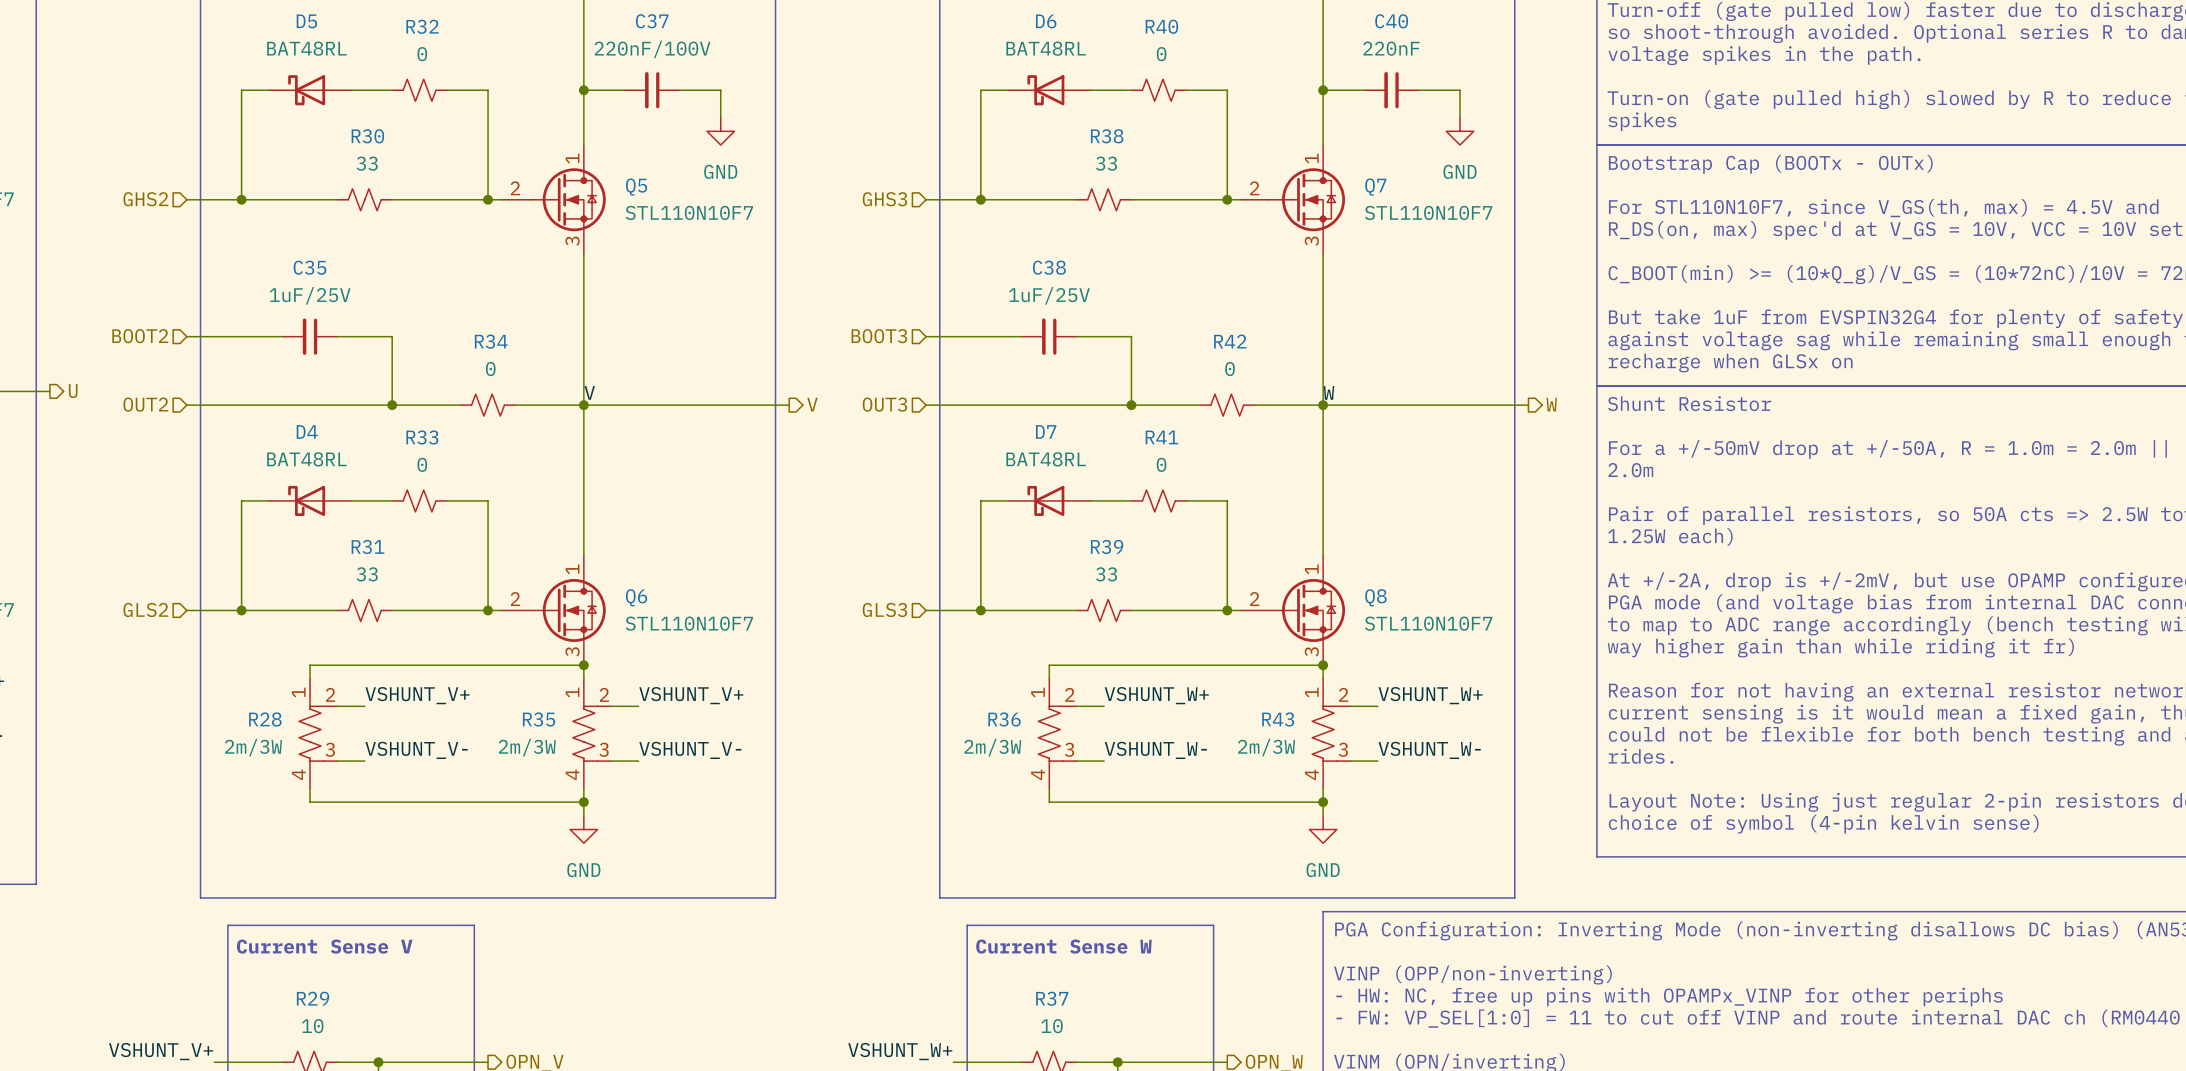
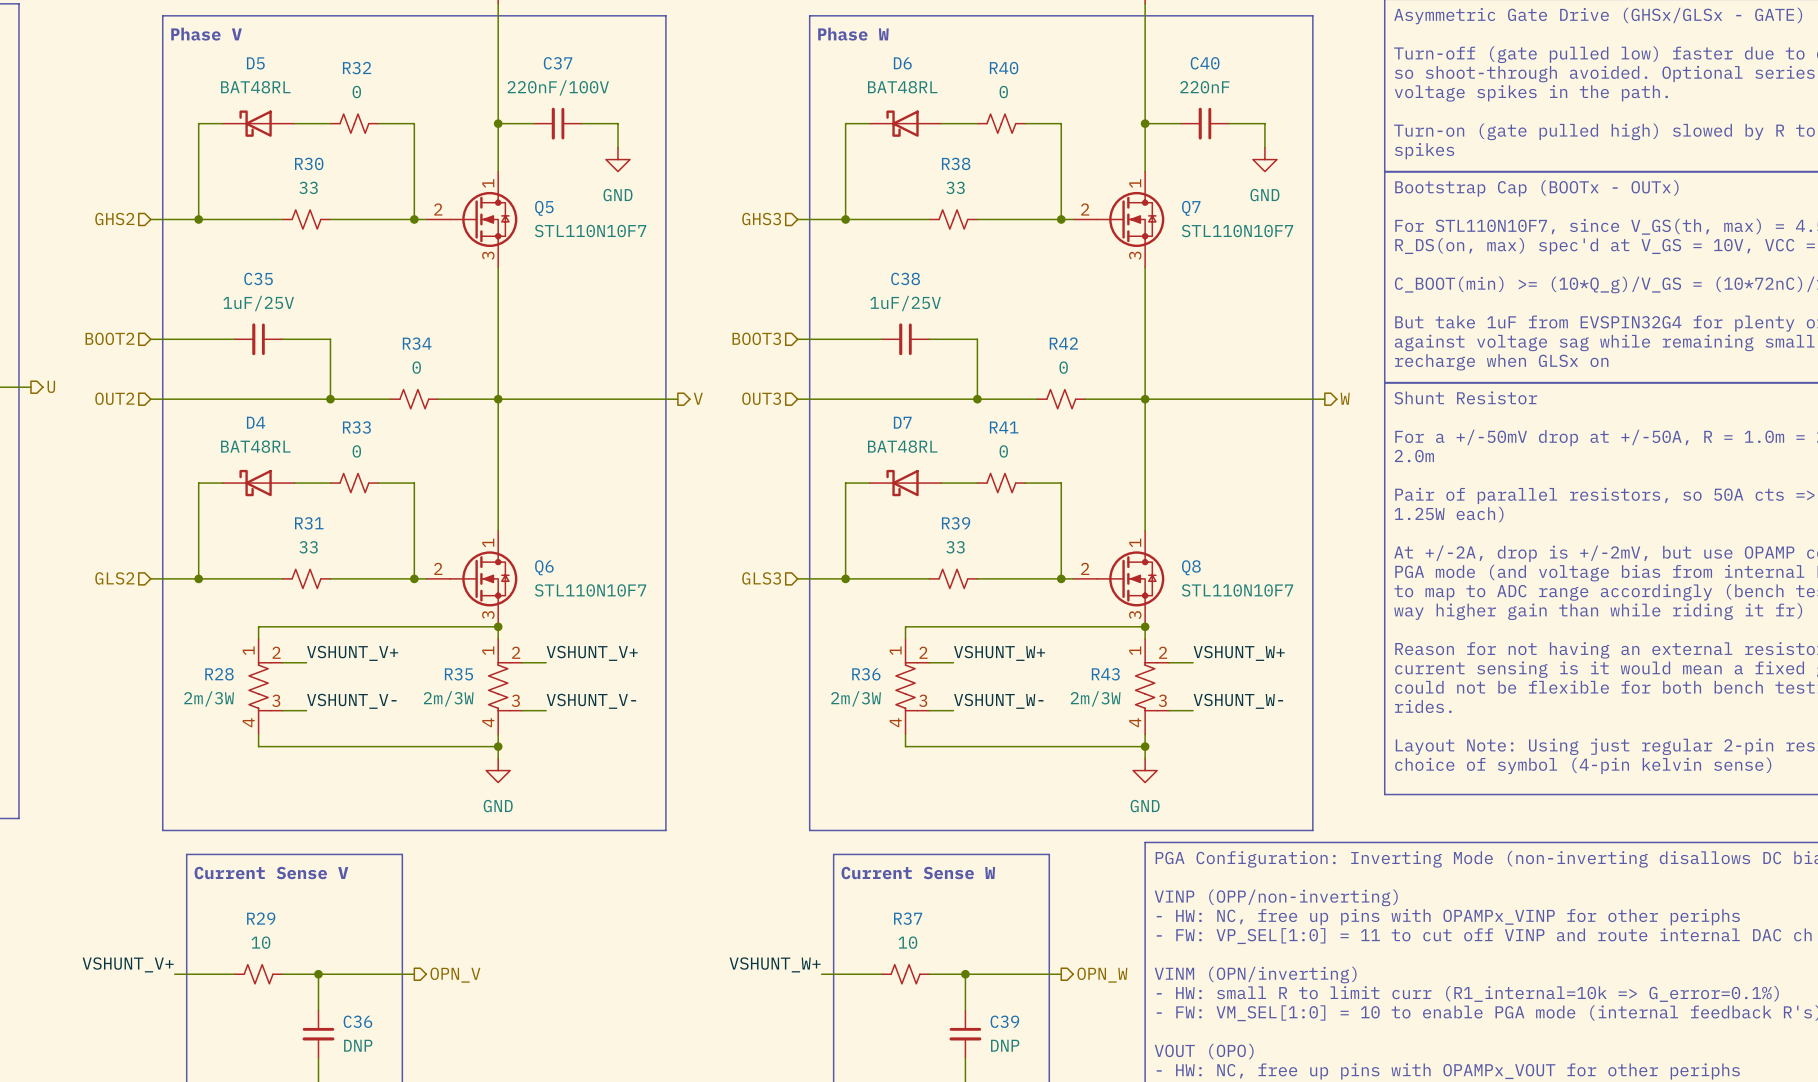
label: V (589, 392) -> none
label: W (1329, 392) -> none

